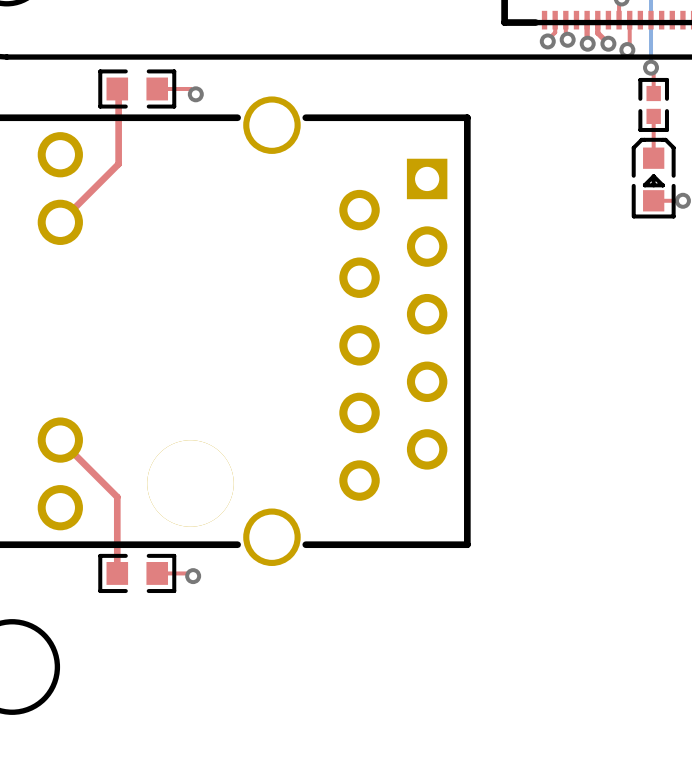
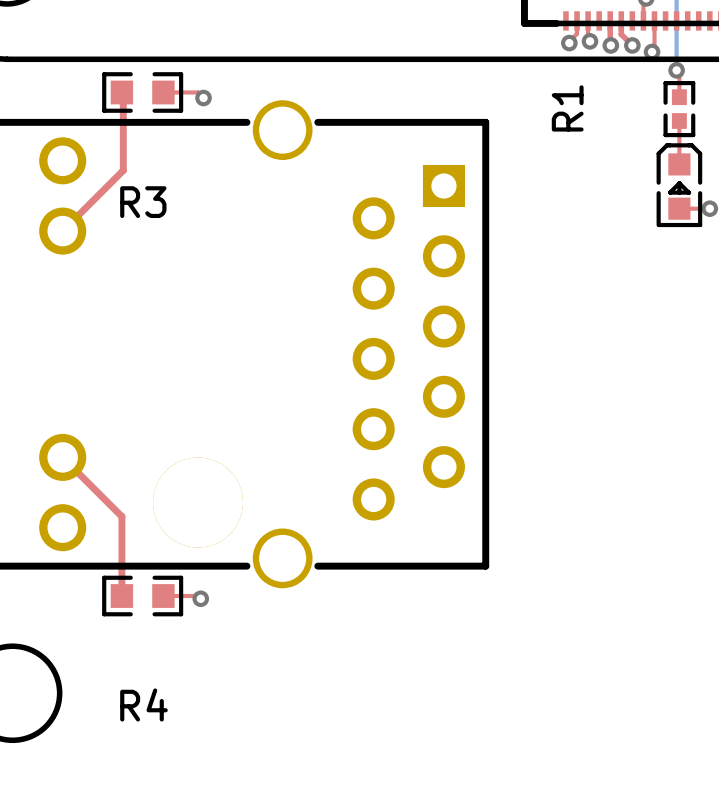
R1 name: none -> R1 (567, 108)
R3 name: none -> R3 (143, 202)
R4 name: none -> R4 (143, 704)

